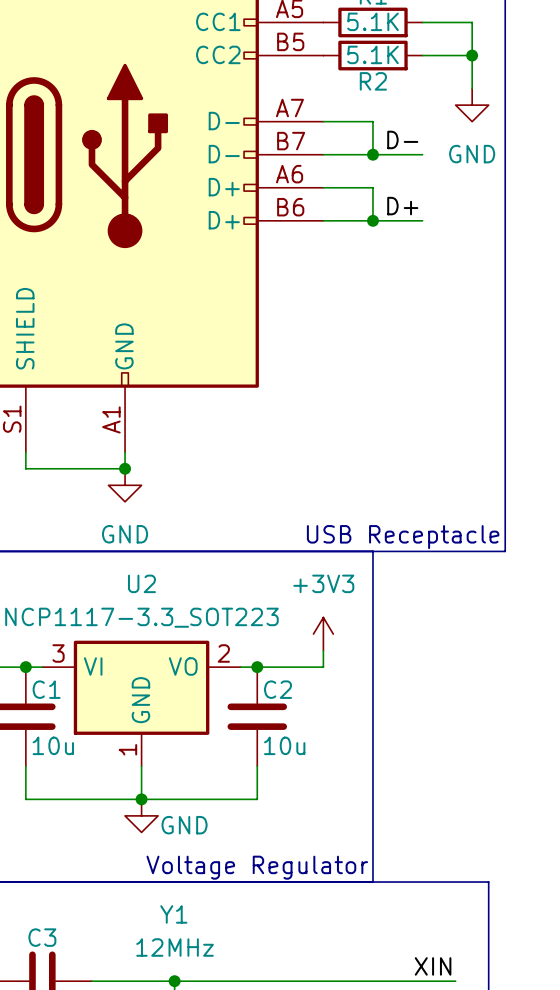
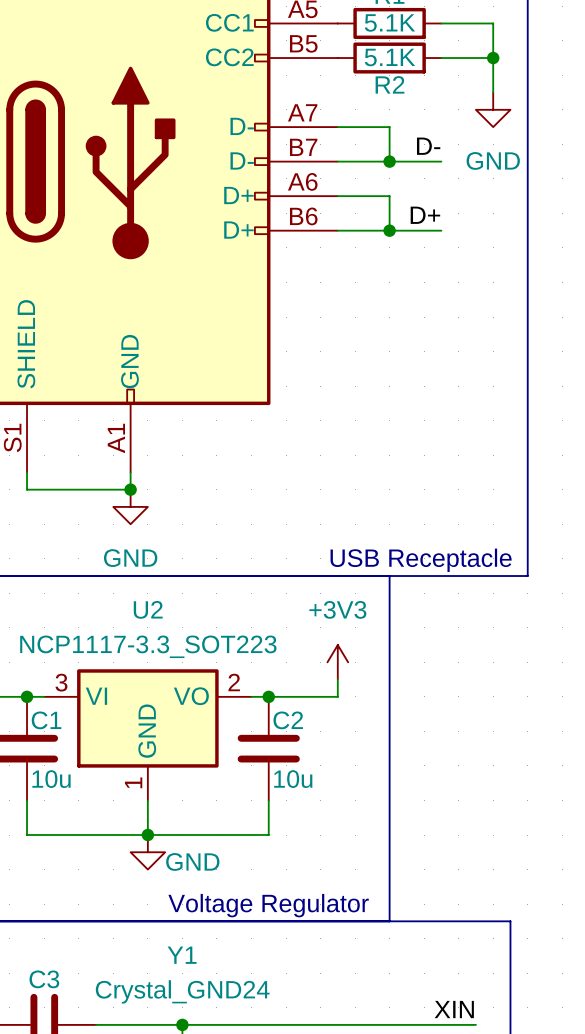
Y1 value: 12MHz (175, 947) -> Crystal_GND24 (182, 991)

